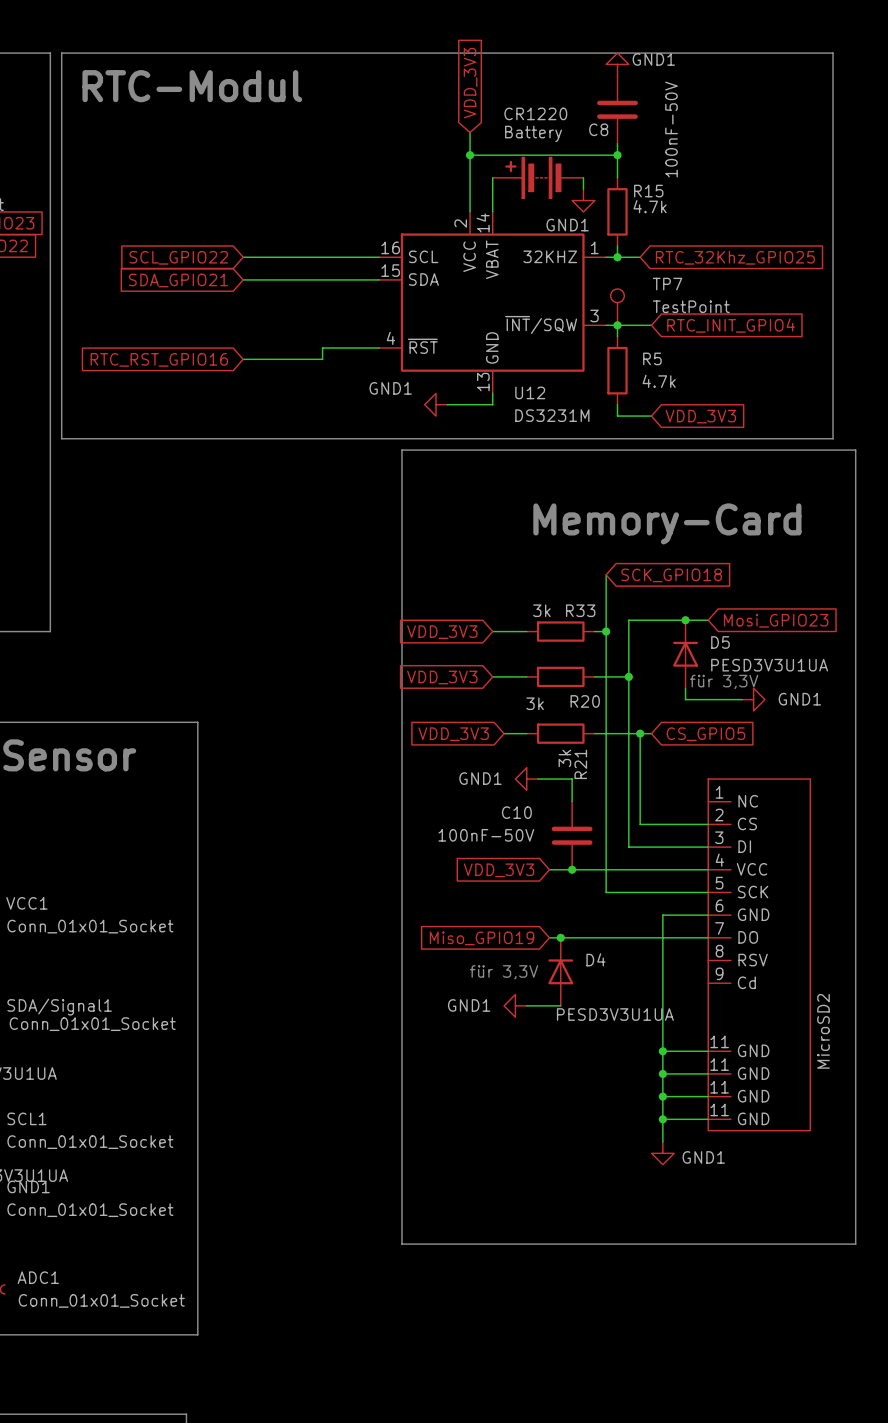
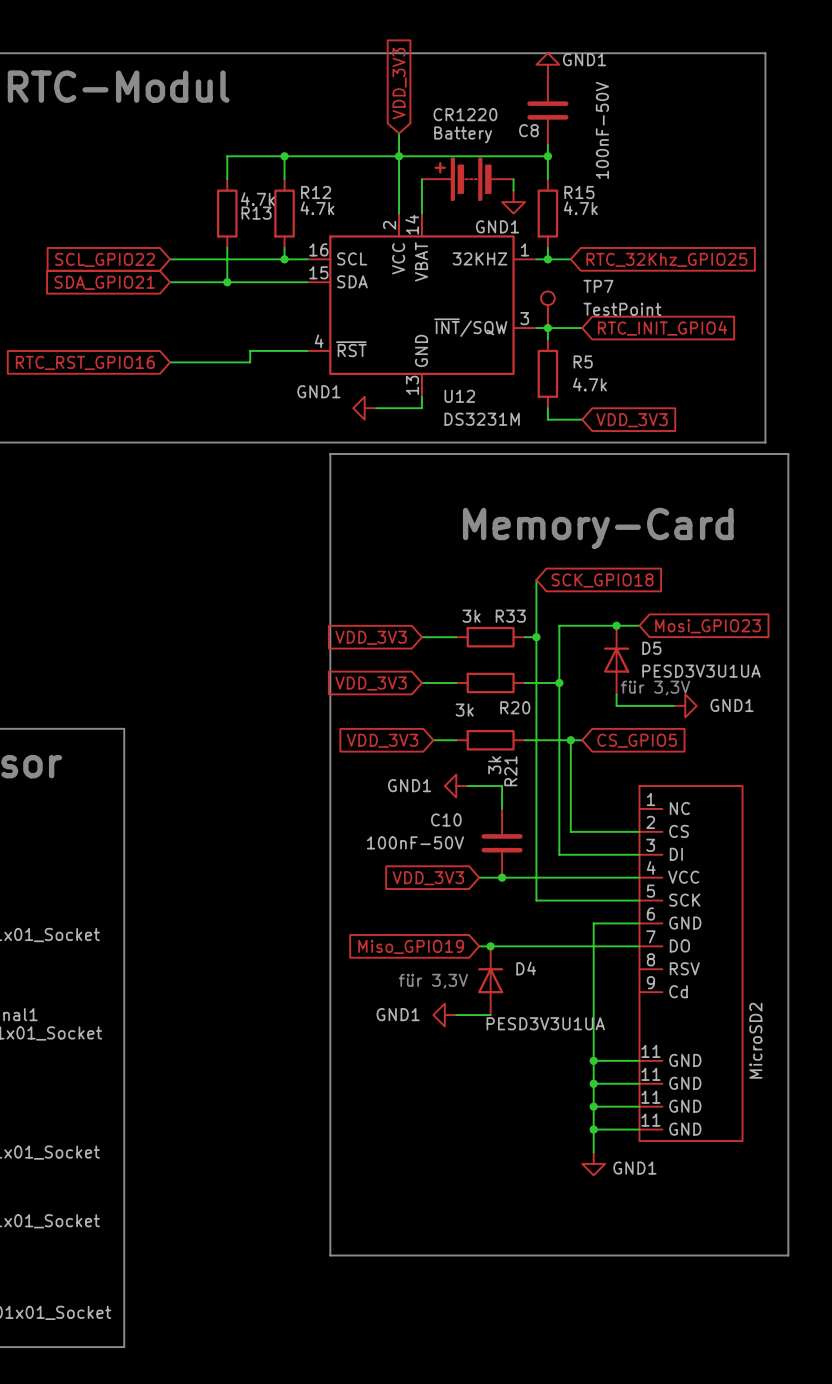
wire: none -> (284, 156) (284, 179)
junction: none -> (284, 156)
wire: none -> (399, 156) (227, 156) (227, 179)
R13: none -> 4.7k (227, 213)
R12: none -> 4.7k (284, 213)
wire: none -> (227, 247) (227, 282)
wire: none -> (284, 247) (284, 259)
junction: none -> (284, 259)
junction: none -> (227, 282)

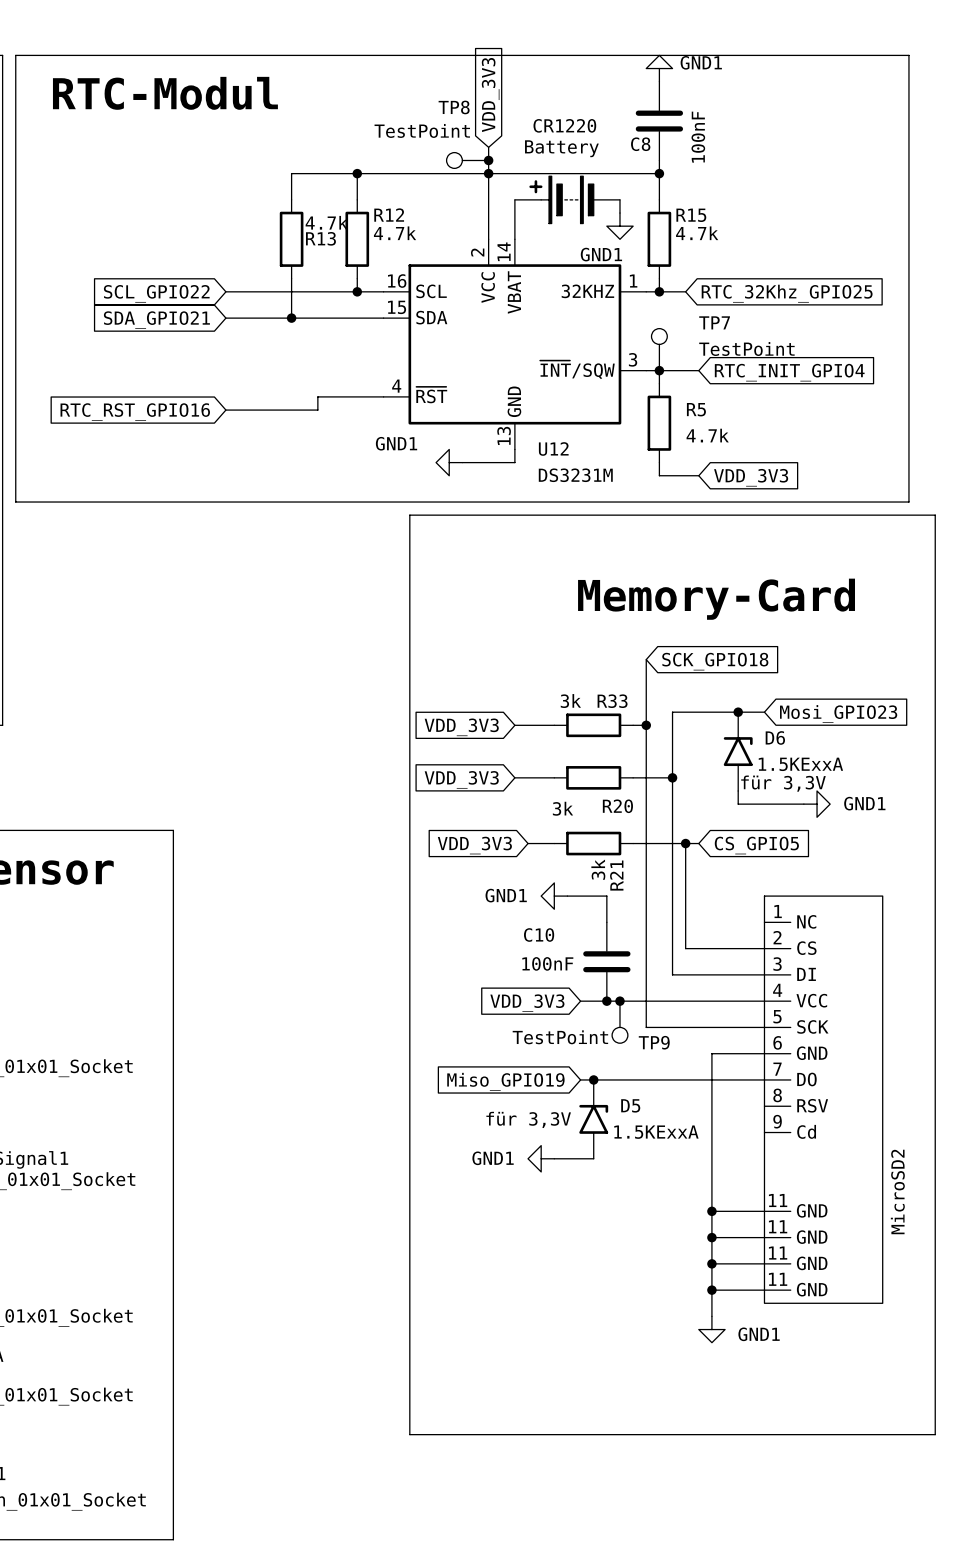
C8 value: 100nF-50V (602, 130) -> 100nF (698, 137)
TP8: none -> TestPoint (467, 160)
junction: none -> (488, 160)
D5 symbol: [603, 625, 630, 695] -> [579, 1079, 609, 1159]
D6: none -> 1.5KExxA (738, 751)
D5 value: PESD3V3U1UA (701, 671) -> 1.5KExxA (656, 1132)
C10 value: 100nF-50V (415, 842) -> 100nF (547, 963)
junction: none -> (619, 1001)
TP9: none -> TestPoint (619, 1022)
D4: PESD3V3U1UA (490, 980) -> none

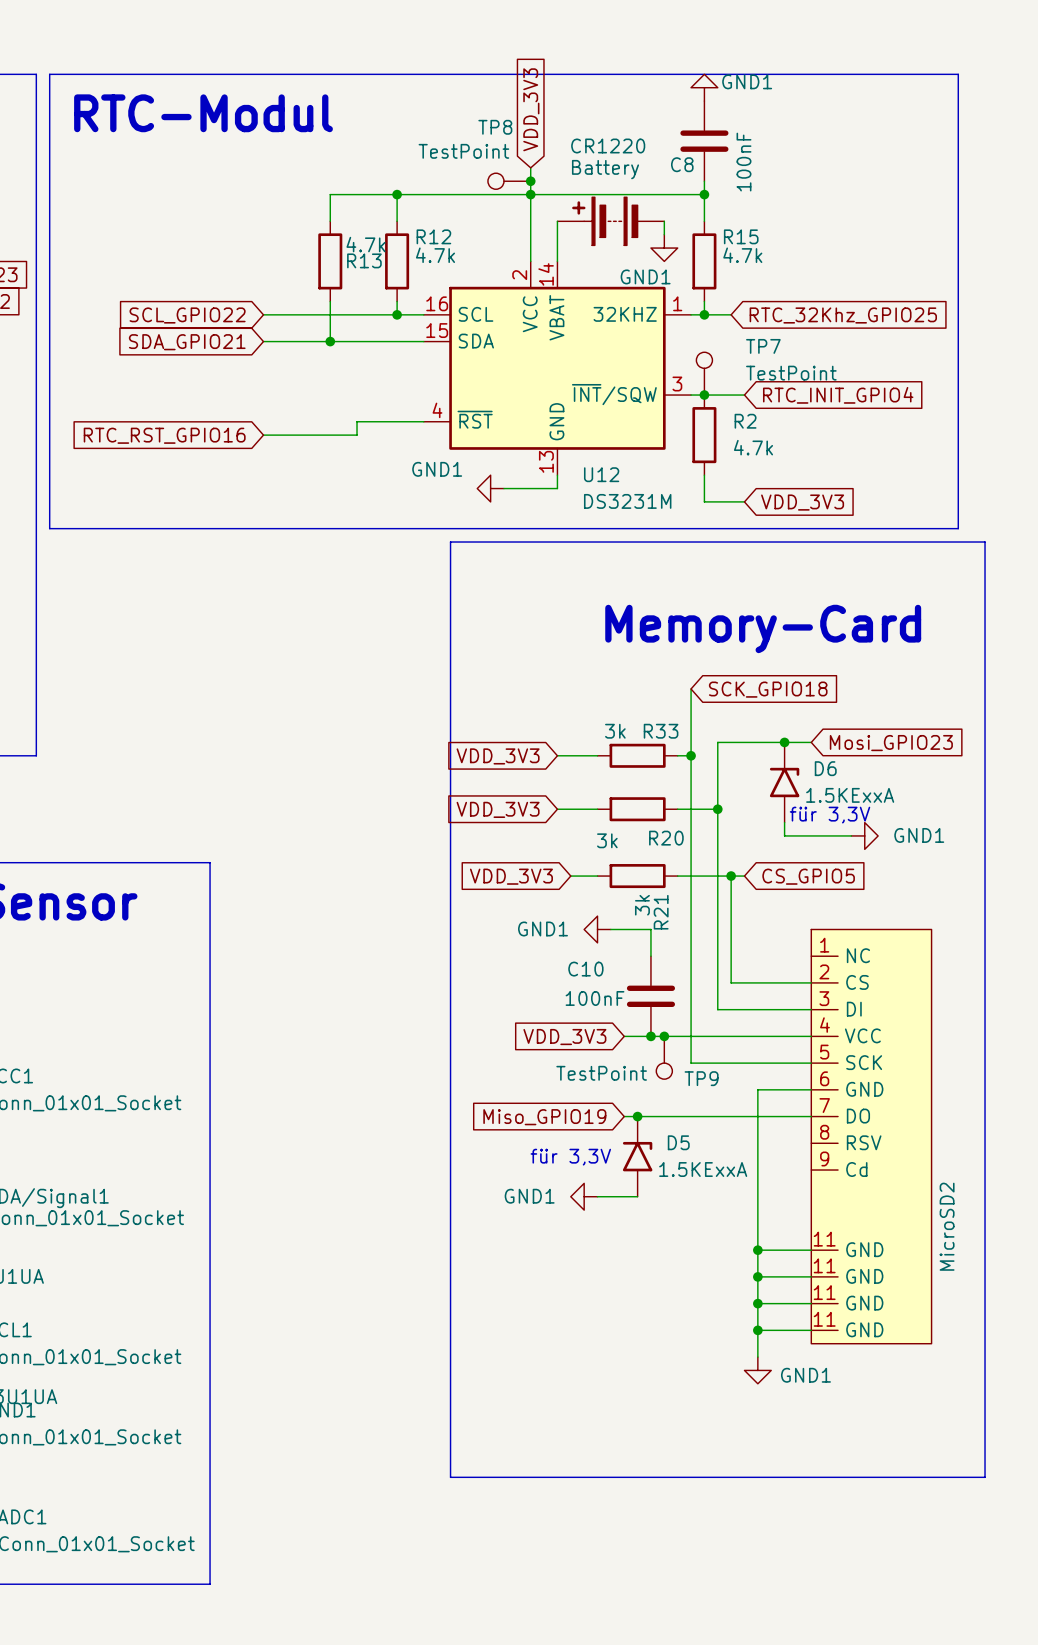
R2: none -> 4.7k (704, 435)
R5: 4.7k (659, 423) -> none

